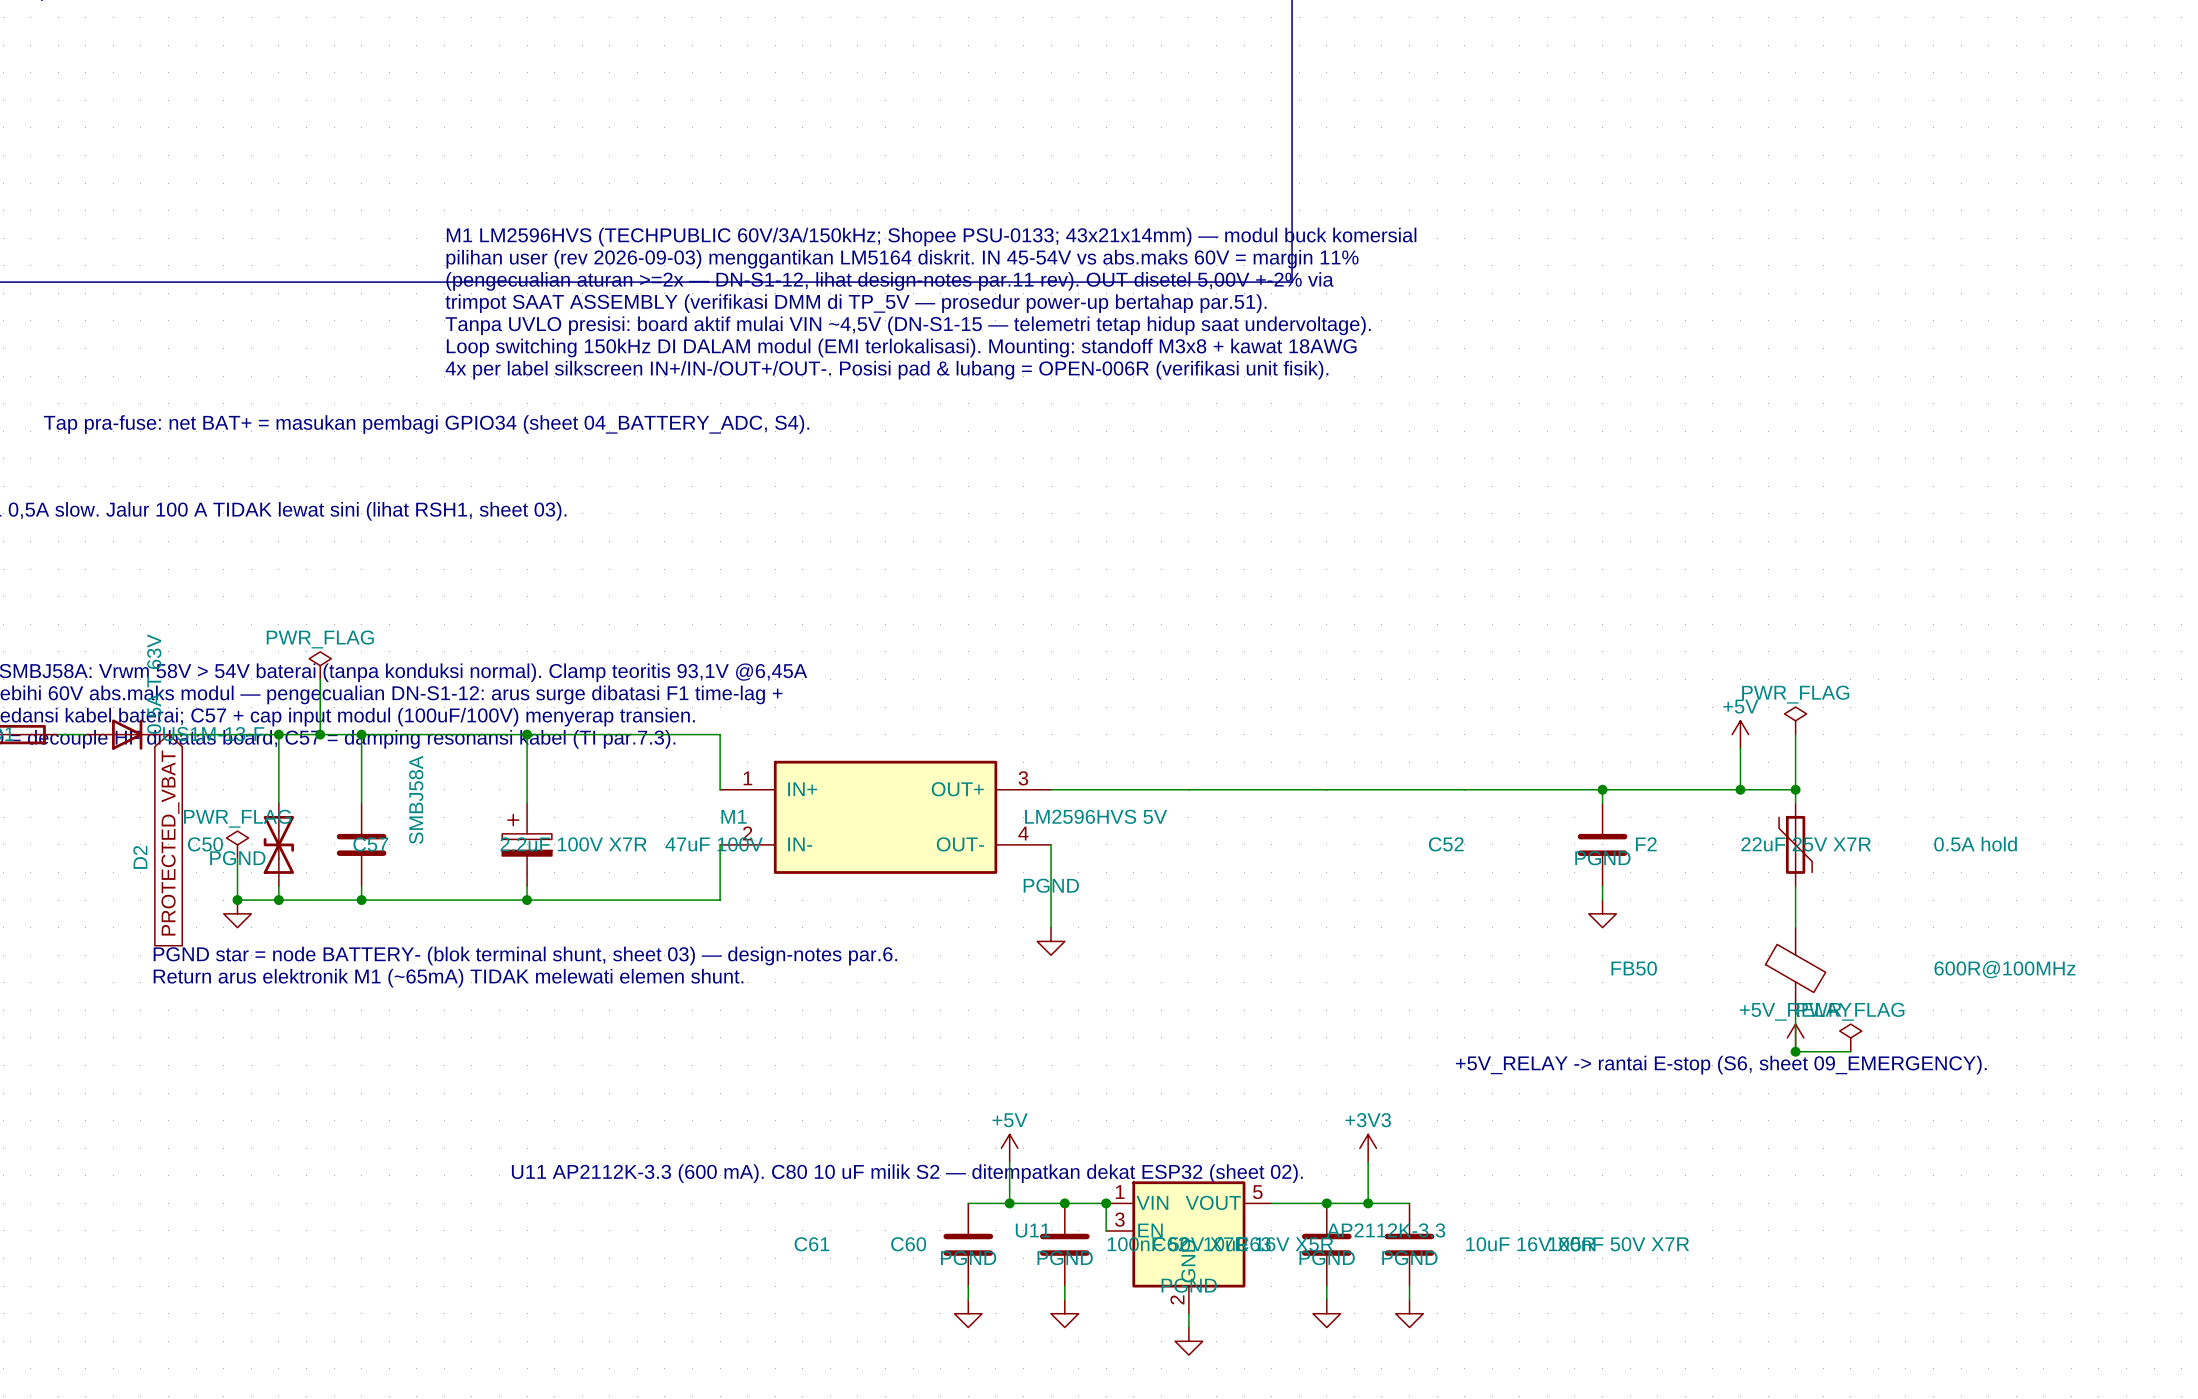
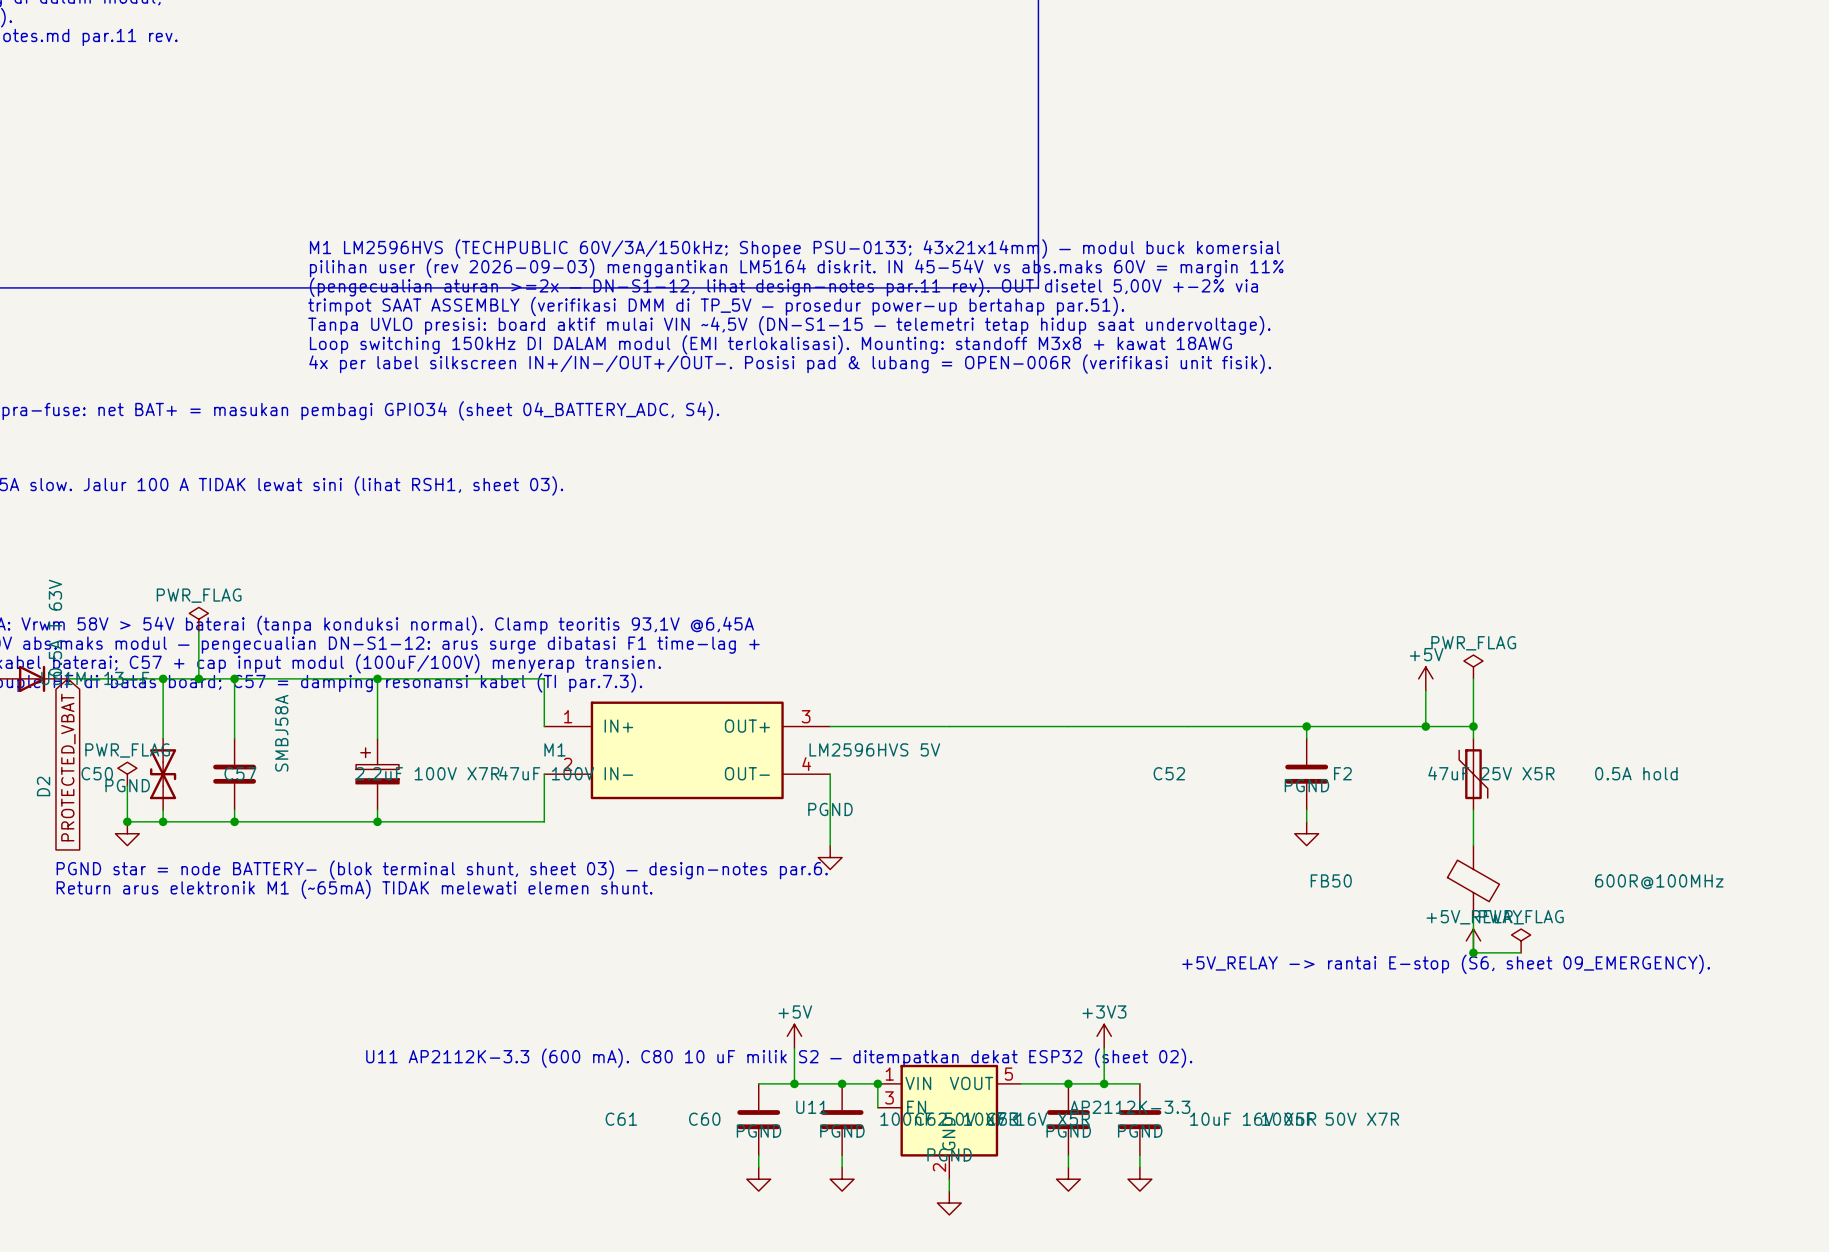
C52 value: 22uF 25V X7R (1806, 844) -> 47uF 25V X5R (1491, 773)

